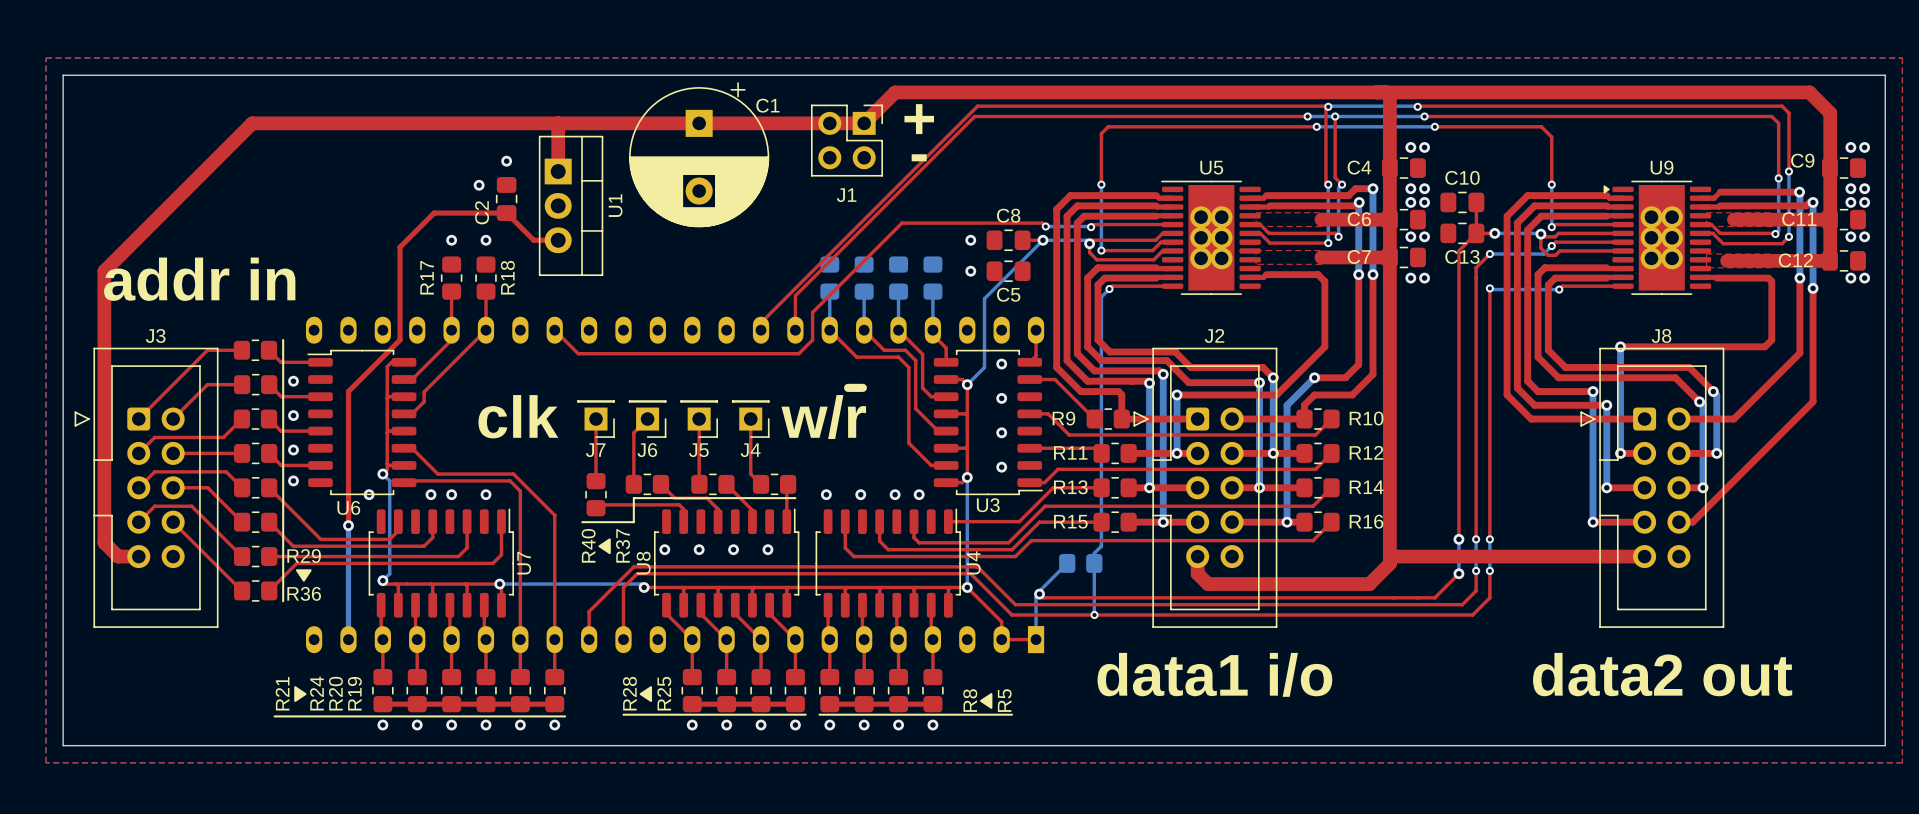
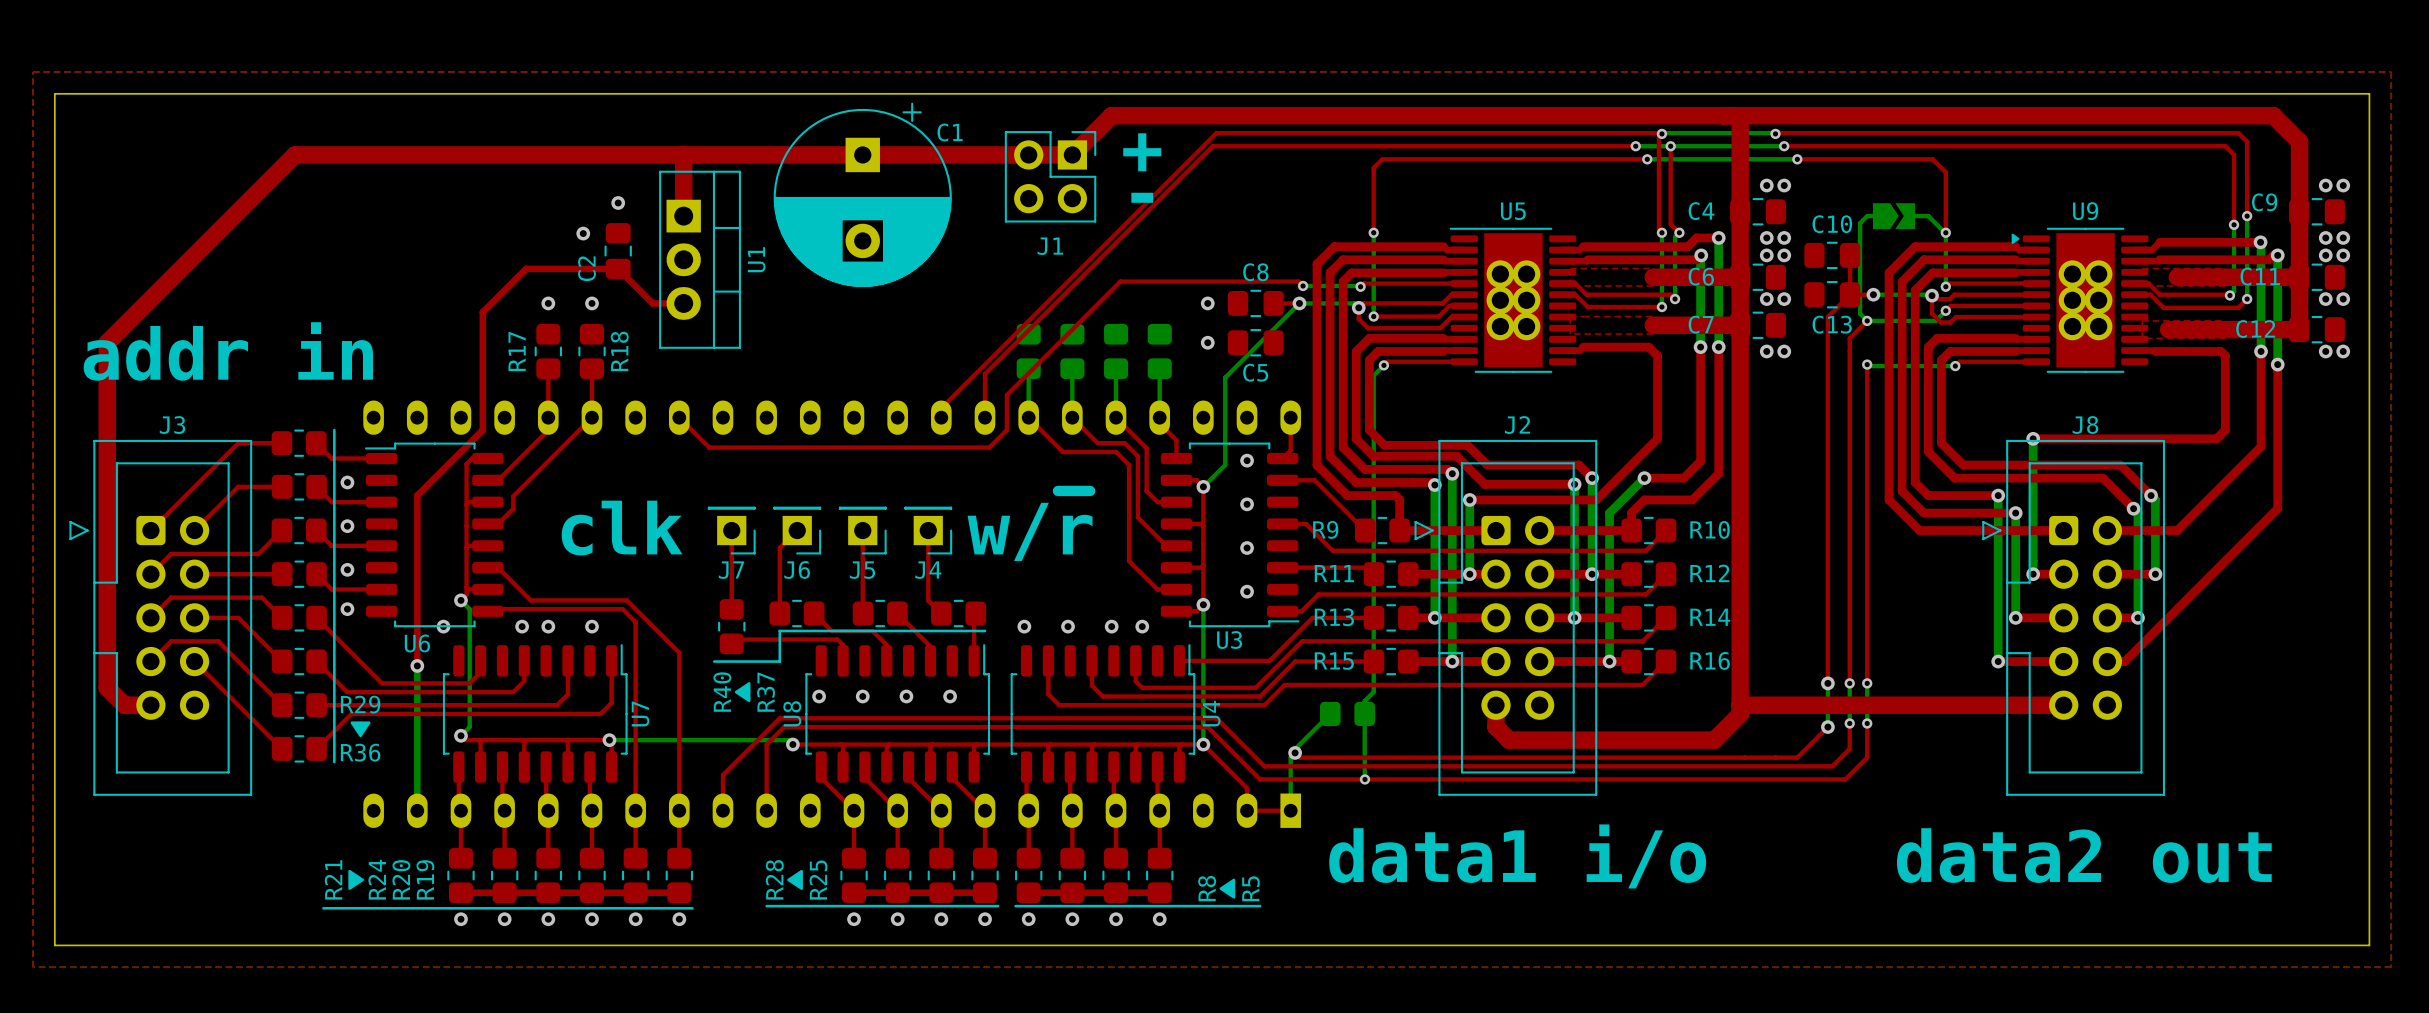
bottom track: none -> (1881, 216) (1867, 216) (1860, 223) (1860, 313) (1867, 320)
part: none -> (1894, 216)
bottom track: none -> (1906, 216) (1928, 216) (1945, 232)

